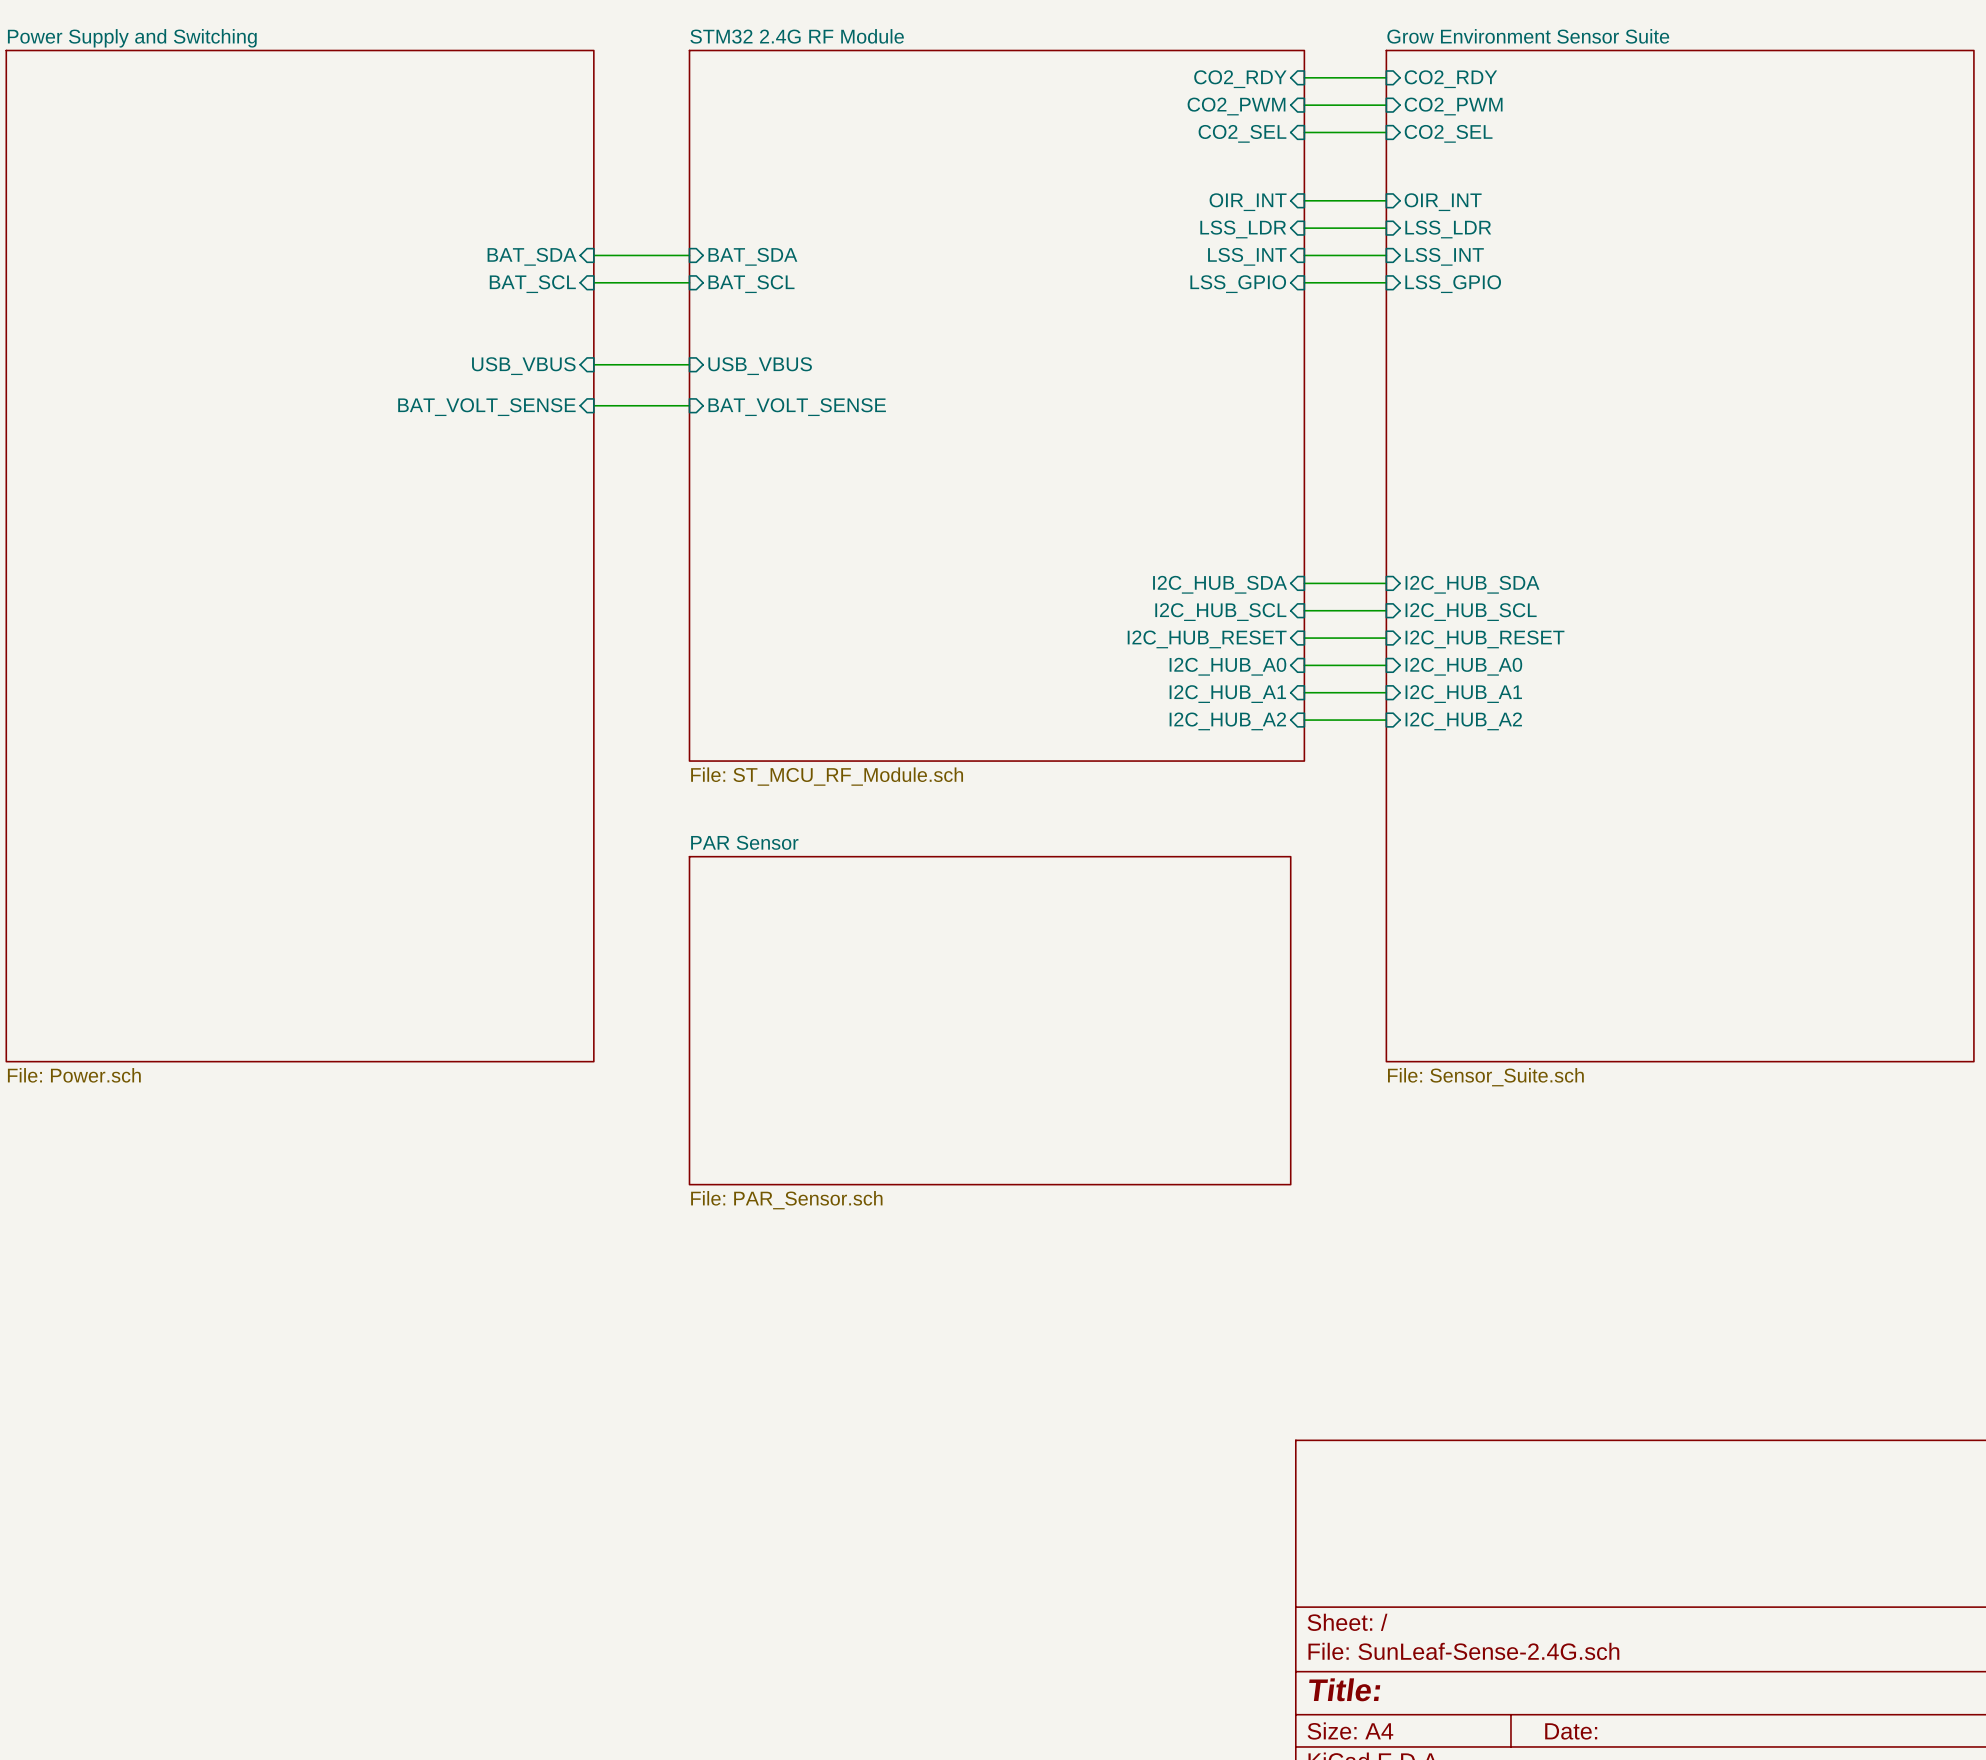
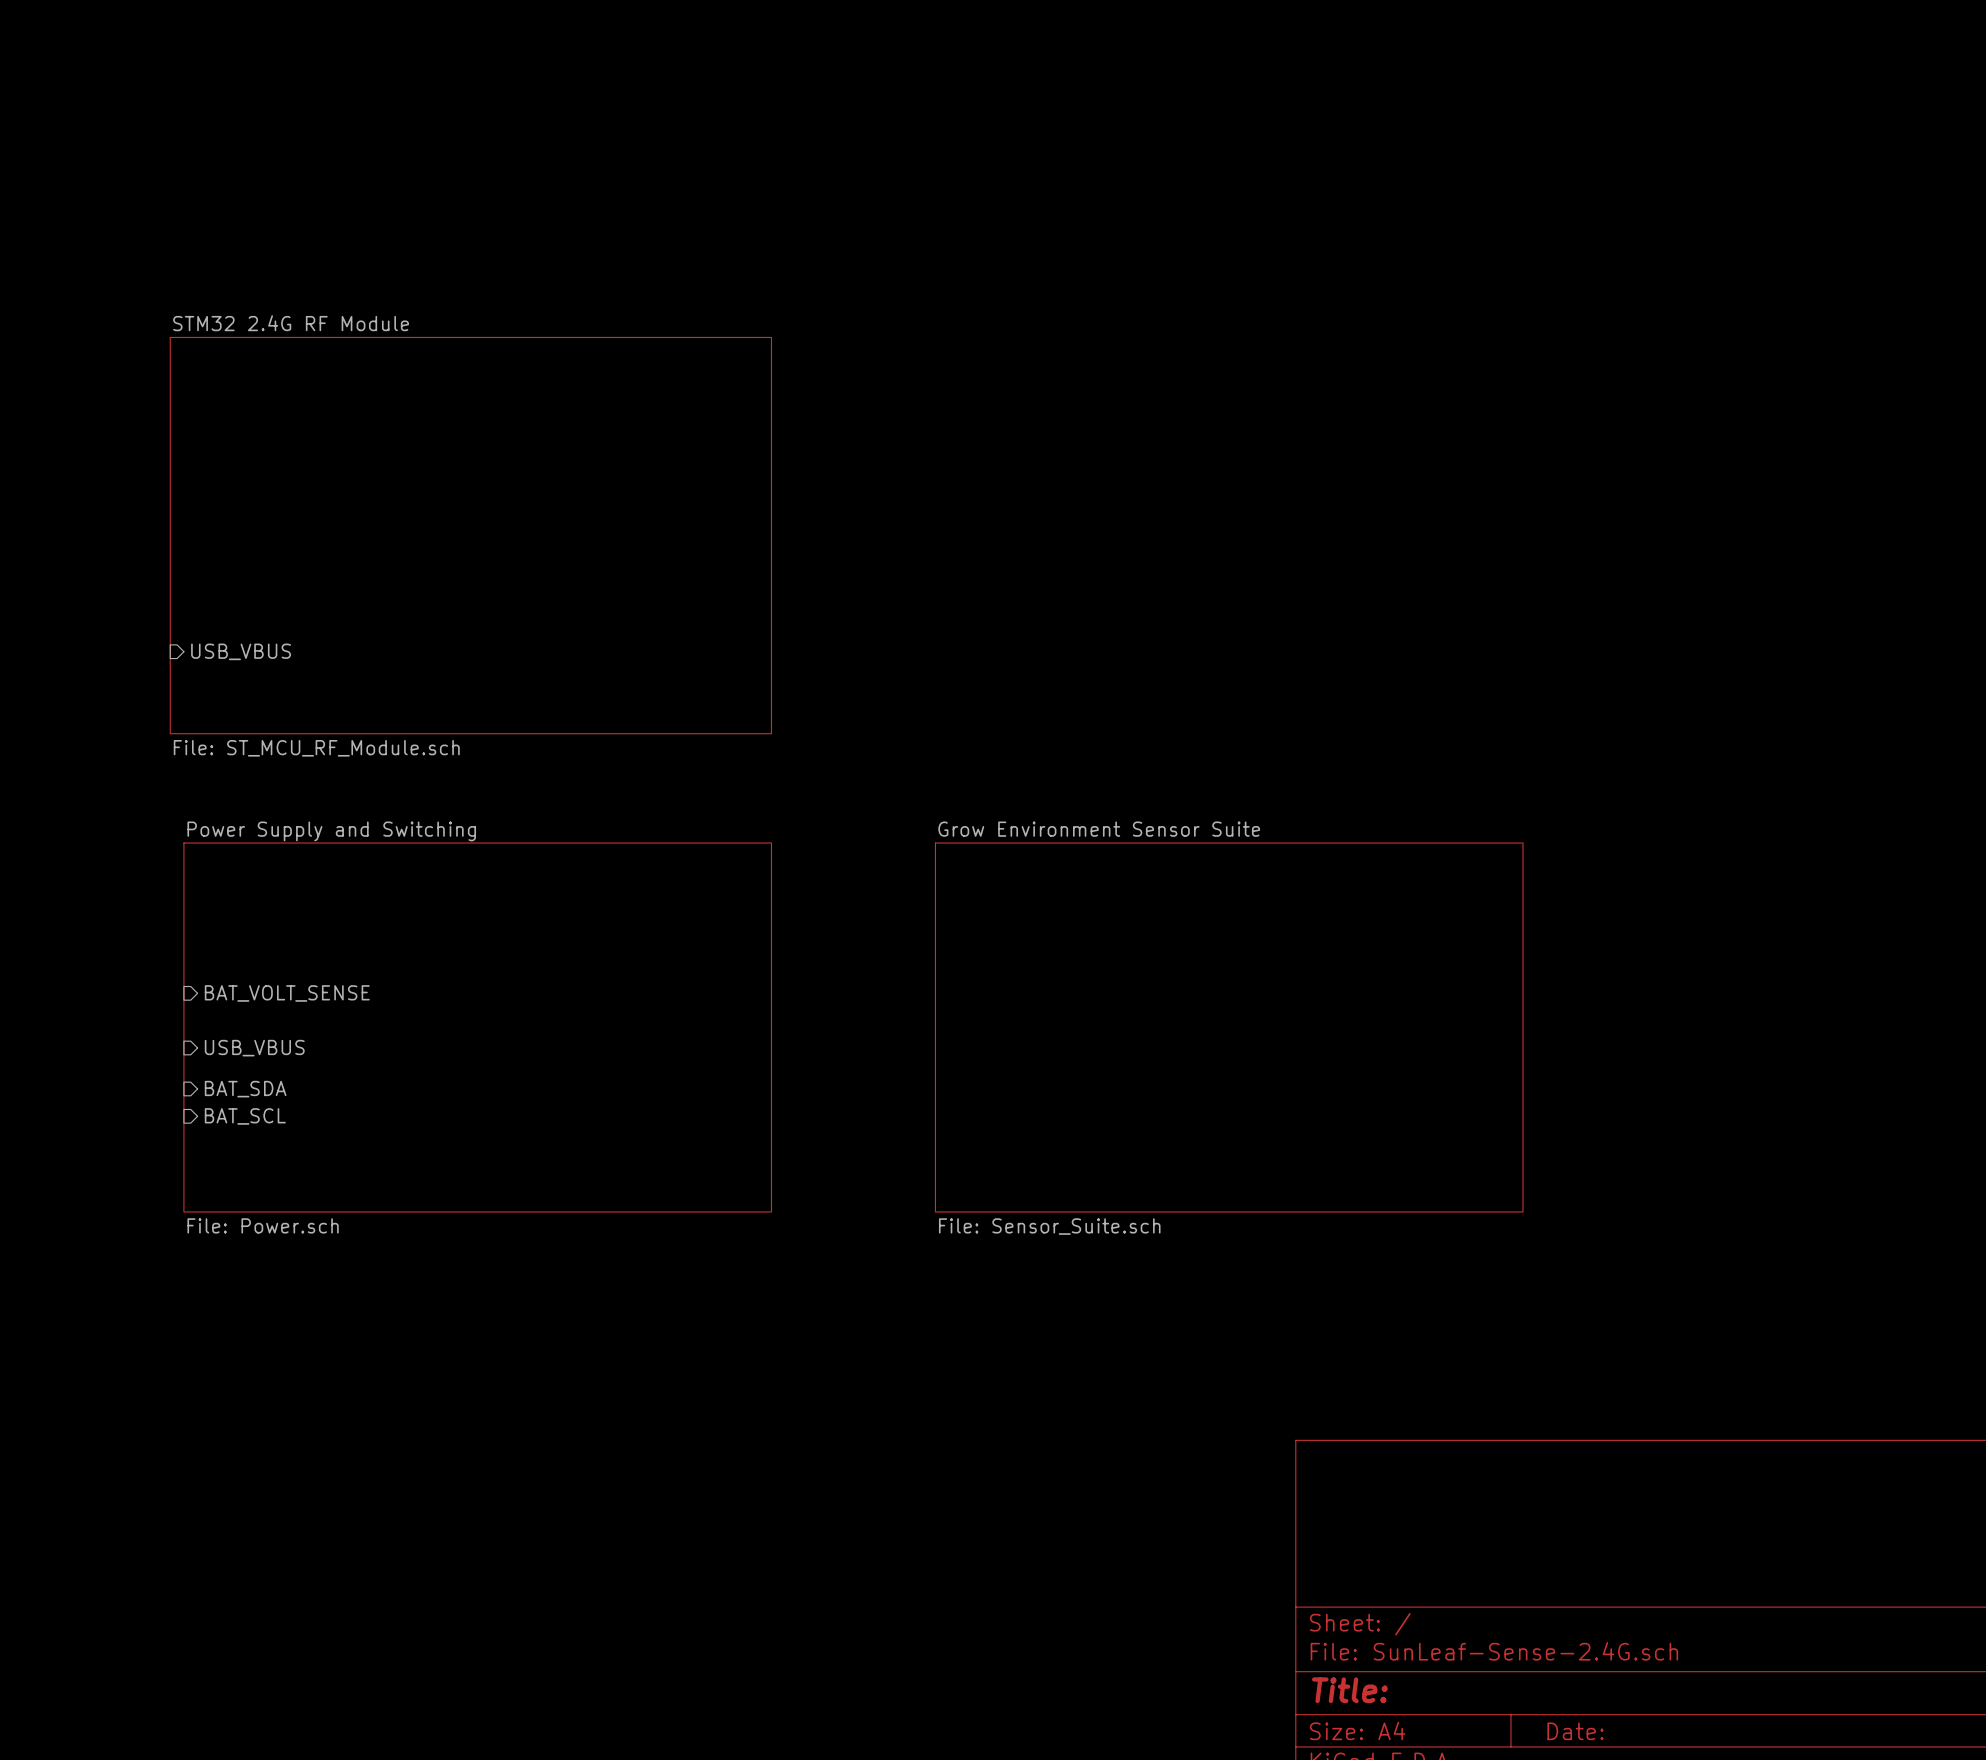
sheet STM32 2.4G RF Module name position: STM32 2.4G RF Module (797, 36) -> STM32 2.4G RF Module (291, 323)
sheet STM32 2.4G RF Module shape: [689, 50, 1305, 762] -> [170, 337, 772, 734]
wire: (1304, 77) (1386, 77) -> none
sheet pin: CO2_RDY (1240, 79) -> none
sheet pin: CO2_RDY (1450, 79) -> none
wire: (1304, 105) (1386, 105) -> none
sheet pin: CO2_PWM (1236, 106) -> none
sheet pin: CO2_PWM (1453, 106) -> none
wire: (1304, 132) (1386, 132) -> none
sheet pin: CO2_SEL (1242, 133) -> none
sheet pin: CO2_SEL (1448, 133) -> none
wire: (1304, 200) (1386, 200) -> none
sheet pin: OIR_INT (1248, 202) -> none
sheet pin: OIR_INT (1443, 202) -> none
wire: (1304, 228) (1386, 228) -> none
sheet pin: LSS_LDR (1243, 229) -> none
sheet pin: LSS_LDR (1448, 229) -> none
wire: (593, 255) (689, 255) -> none
wire: (1304, 255) (1386, 255) -> none
sheet pin: BAT_SDA (532, 256) -> none
sheet pin: BAT_SDA (752, 256) -> none
sheet pin: LSS_INT (1247, 256) -> none
sheet pin: LSS_INT (1444, 256) -> none
wire: (593, 282) (689, 282) -> none
wire: (1304, 282) (1386, 282) -> none
sheet pin: BAT_SCL (532, 284) -> none
sheet pin: BAT_SCL (751, 284) -> none
sheet pin: LSS_GPIO (1238, 284) -> none
sheet pin: LSS_GPIO (1453, 284) -> none
wire: (593, 364) (689, 364) -> none
sheet pin: USB_VBUS (523, 366) -> none
sheet pin: USB_VBUS (760, 366) -> none
wire: (593, 405) (689, 405) -> none
sheet pin: BAT_VOLT_SENSE (486, 407) -> none
sheet pin: BAT_VOLT_SENSE (797, 407) -> none
sheet Power Supply and Switching: File: Power.sch (300, 556) -> none
sheet Grow Environment Sensor Suite: File: Sensor_Suite.sch (1680, 556) -> none
wire: (1304, 583) (1386, 583) -> none
sheet pin: I2C_HUB_SDA (1220, 584) -> none
sheet pin: I2C_HUB_SDA (1472, 584) -> none
wire: (1304, 610) (1386, 610) -> none
sheet pin: I2C_HUB_SCL (1220, 612) -> none
sheet pin: I2C_HUB_SCL (1471, 612) -> none
wire: (1304, 638) (1386, 638) -> none
sheet pin: I2C_HUB_RESET (1207, 639) -> none
sheet pin: I2C_HUB_RESET (1484, 639) -> none
sheet pin: none -> USB_VBUS (241, 651)
wire: (1304, 665) (1386, 665) -> none
sheet pin: I2C_HUB_A0 (1227, 666) -> none
sheet pin: I2C_HUB_A0 (1463, 666) -> none
wire: (1304, 692) (1386, 692) -> none
sheet pin: I2C_HUB_A1 (1227, 694) -> none
sheet pin: I2C_HUB_A1 (1463, 694) -> none
wire: (1304, 720) (1386, 720) -> none
sheet pin: I2C_HUB_A2 (1227, 721) -> none
sheet pin: I2C_HUB_A2 (1463, 721) -> none
sheet STM32 2.4G RF Module value position: File: ST_MCU_RF_Module.sch (827, 776) -> File: ST_MCU_RF_Module.sch (316, 748)
sheet pin: none -> BAT_VOLT_SENSE (287, 993)
sheet PAR Sensor: File: PAR_Sensor.sch (990, 1020) -> none
sheet Power Supply and Switching: none -> File: Power.sch (477, 1027)
sheet Grow Environment Sensor Suite: none -> File: Sensor_Suite.sch (1229, 1027)
sheet pin: none -> USB_VBUS (254, 1048)
sheet pin: none -> BAT_SDA (245, 1089)
sheet pin: none -> BAT_SCL (245, 1116)

